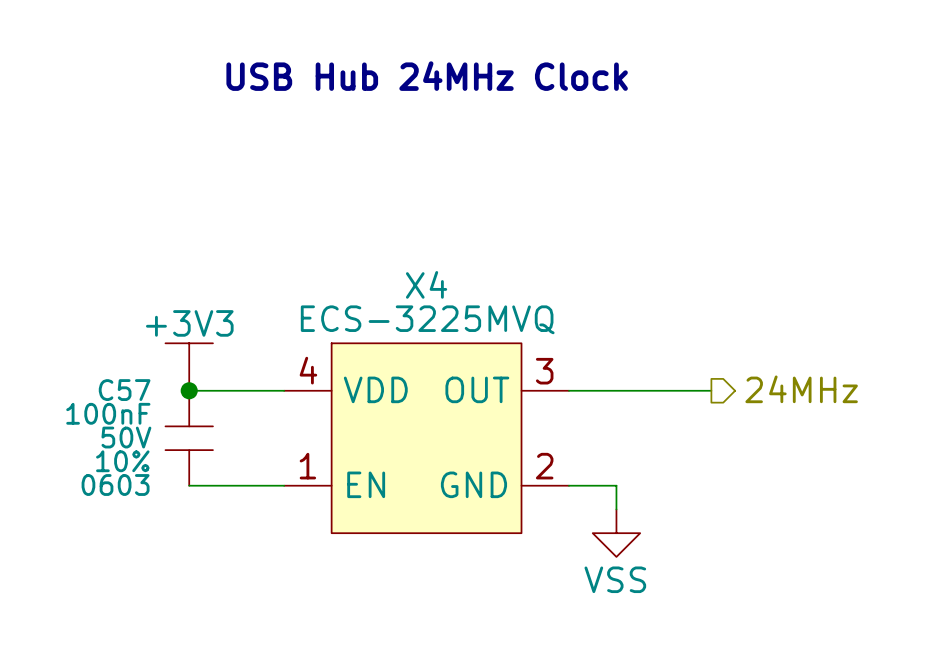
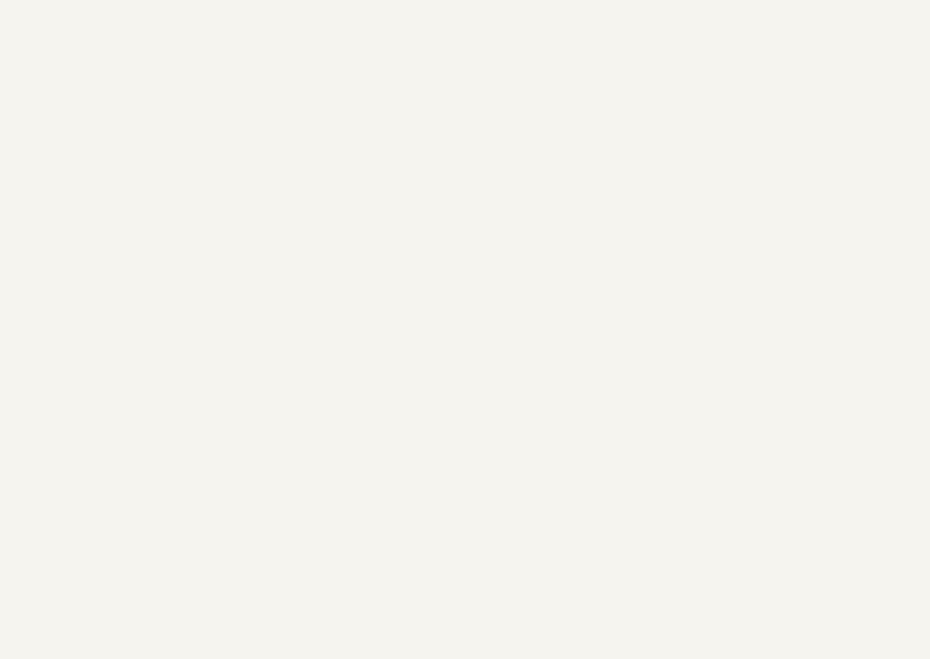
text: USB Hub 24MHz Clock (427, 76) -> none
power symbol: +3V3 (189, 367) -> none
hierarchical label: 24MHz (801, 389) -> none
wire: (189, 390) (284, 390) -> none
junction: (189, 390) -> none
wire: (568, 390) (711, 390) -> none
C57: 100nF (189, 438) -> none
X4: ECS-3225MVQ (426, 438) -> none
wire: (189, 485) (284, 485) -> none
wire: (568, 485) (616, 485) (616, 509) -> none
power symbol: VSS (616, 533) -> none

